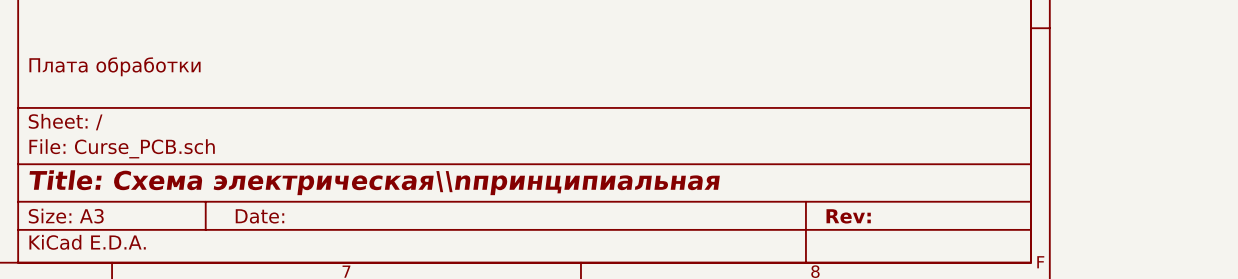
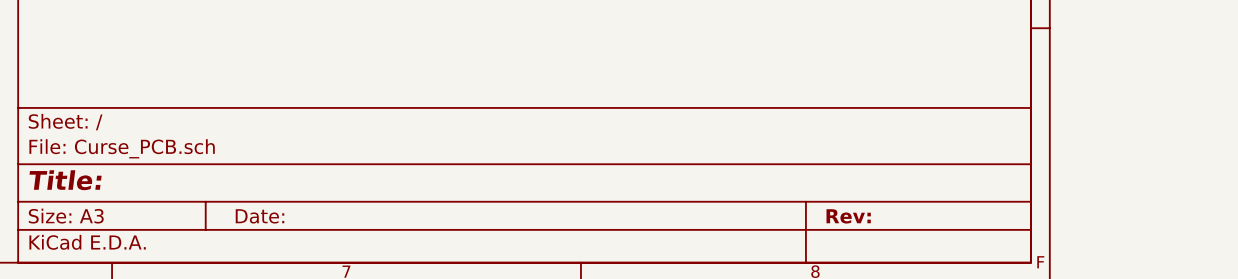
title block: Плата обработки (114, 66) -> none
title block: Title: Схема электрическая\\nпринципиальная (374, 182) -> Title: (65, 180)

